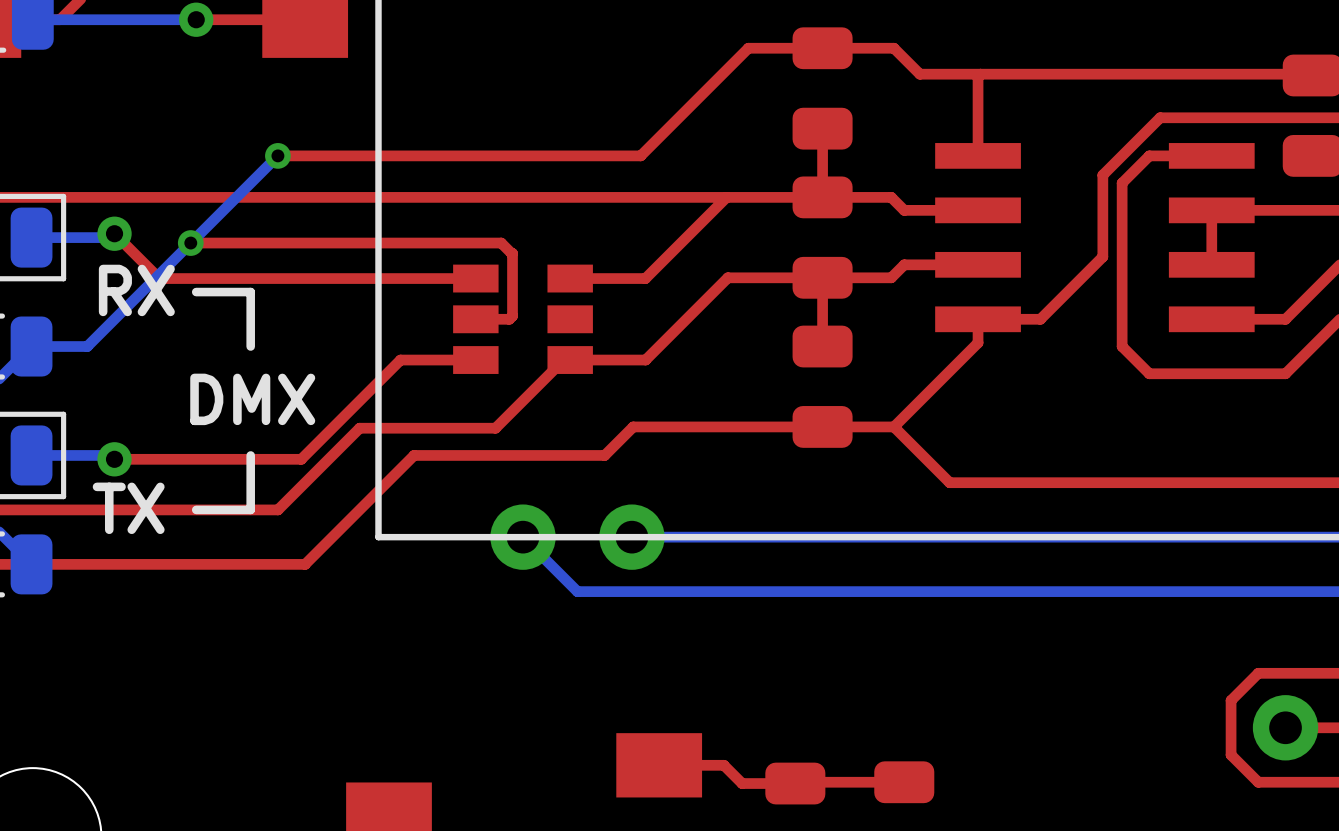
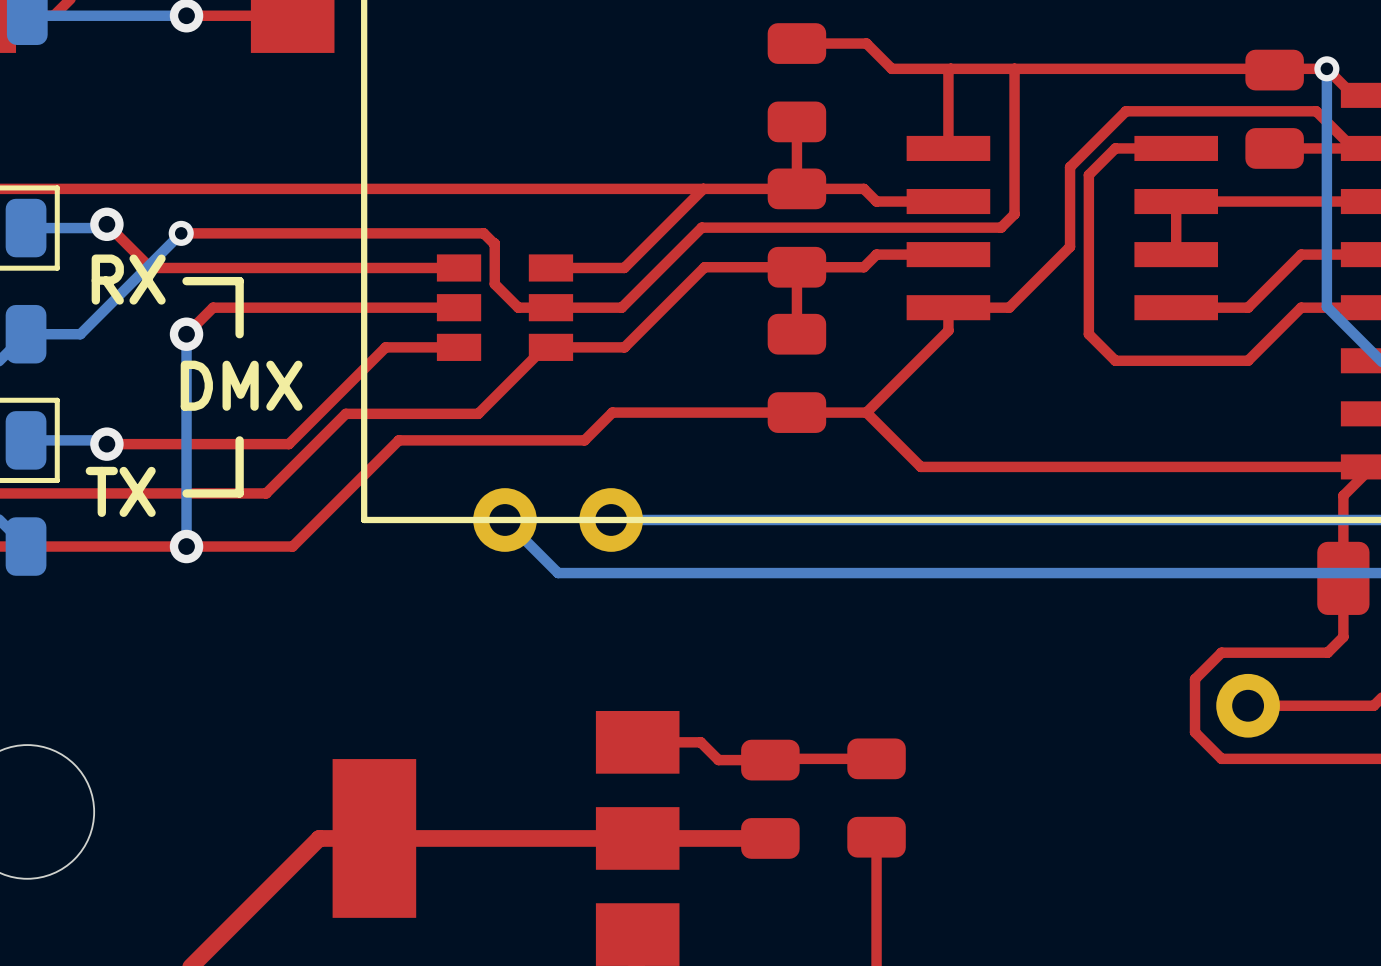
top track: (822, 48) (748, 48) (640, 155) (277, 155) -> none
top track: none -> (1014, 68) (1014, 214) (1001, 227) (701, 227) (621, 307) (518, 307) (494, 284)
bottom track: (277, 155) (196, 237) -> none
via: (277, 155) -> none
top track: (512, 295) (512, 316) (509, 319) (475, 319) -> (186, 334) (213, 307) (459, 307)
bottom track: none -> (186, 334) (186, 546)
via: none -> (186, 334)
via: none -> (186, 546)

